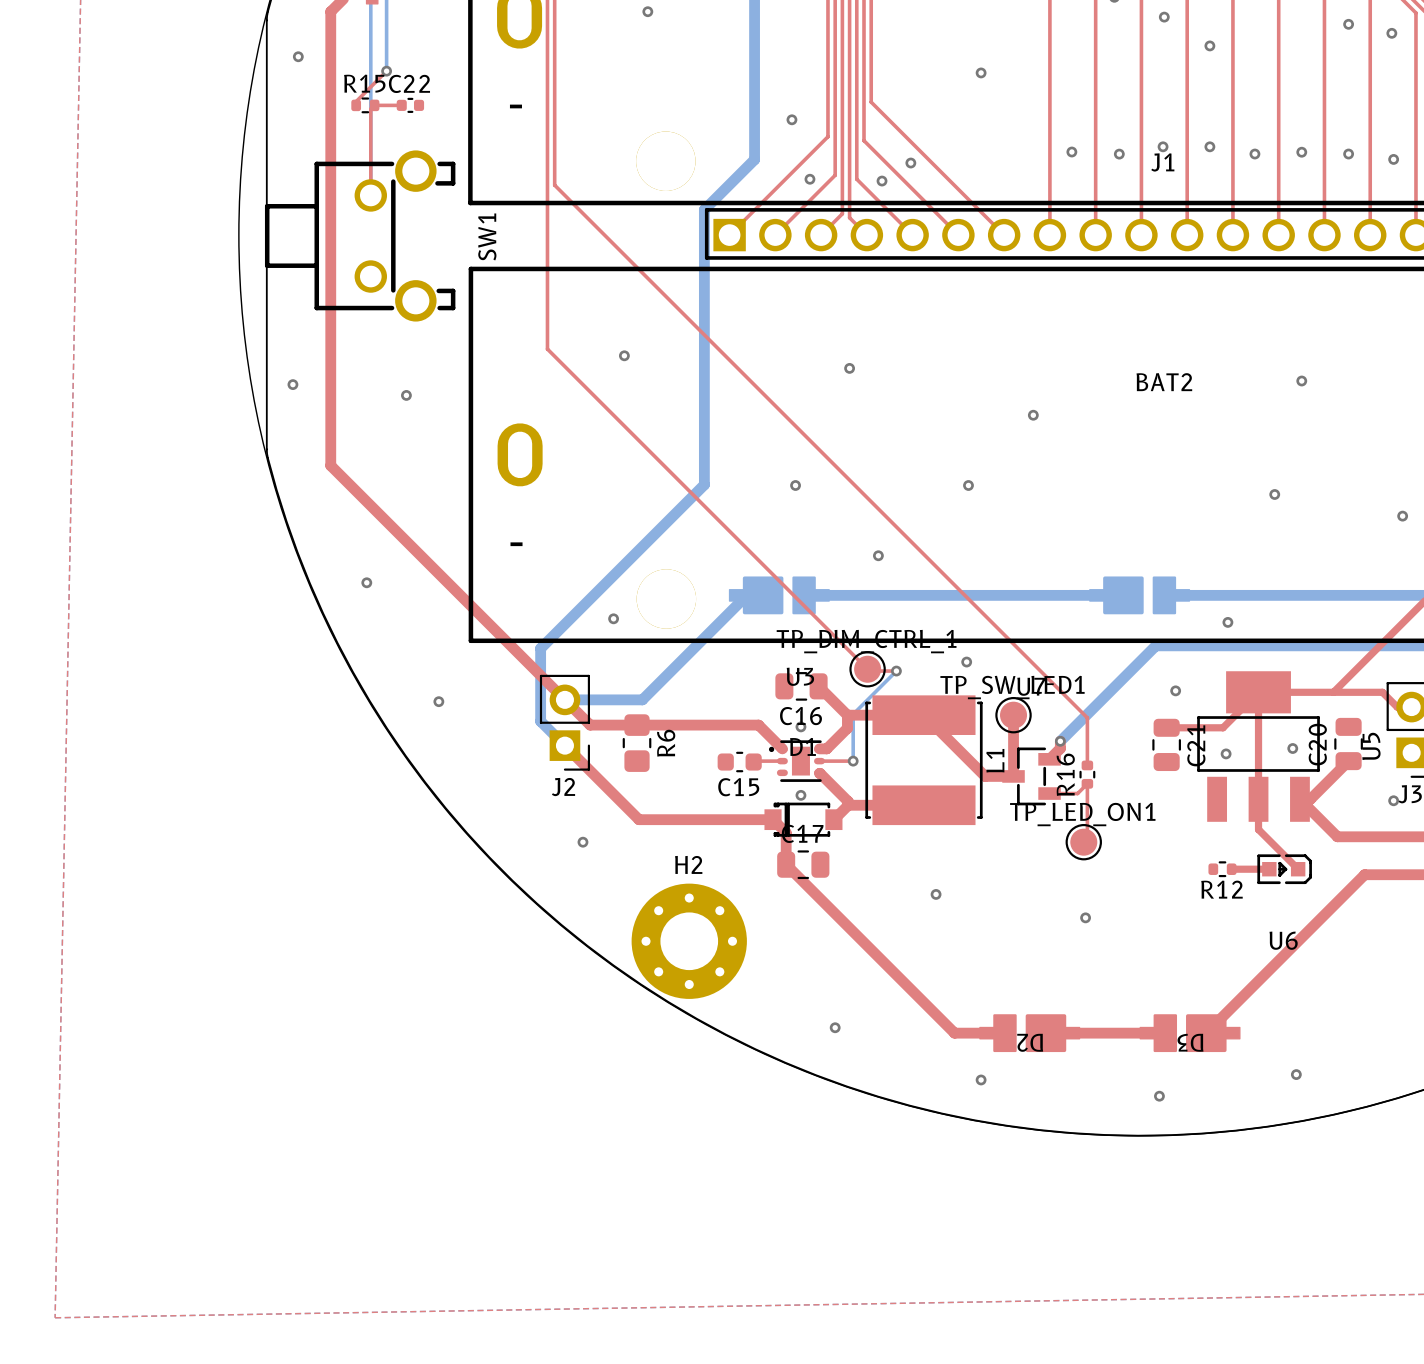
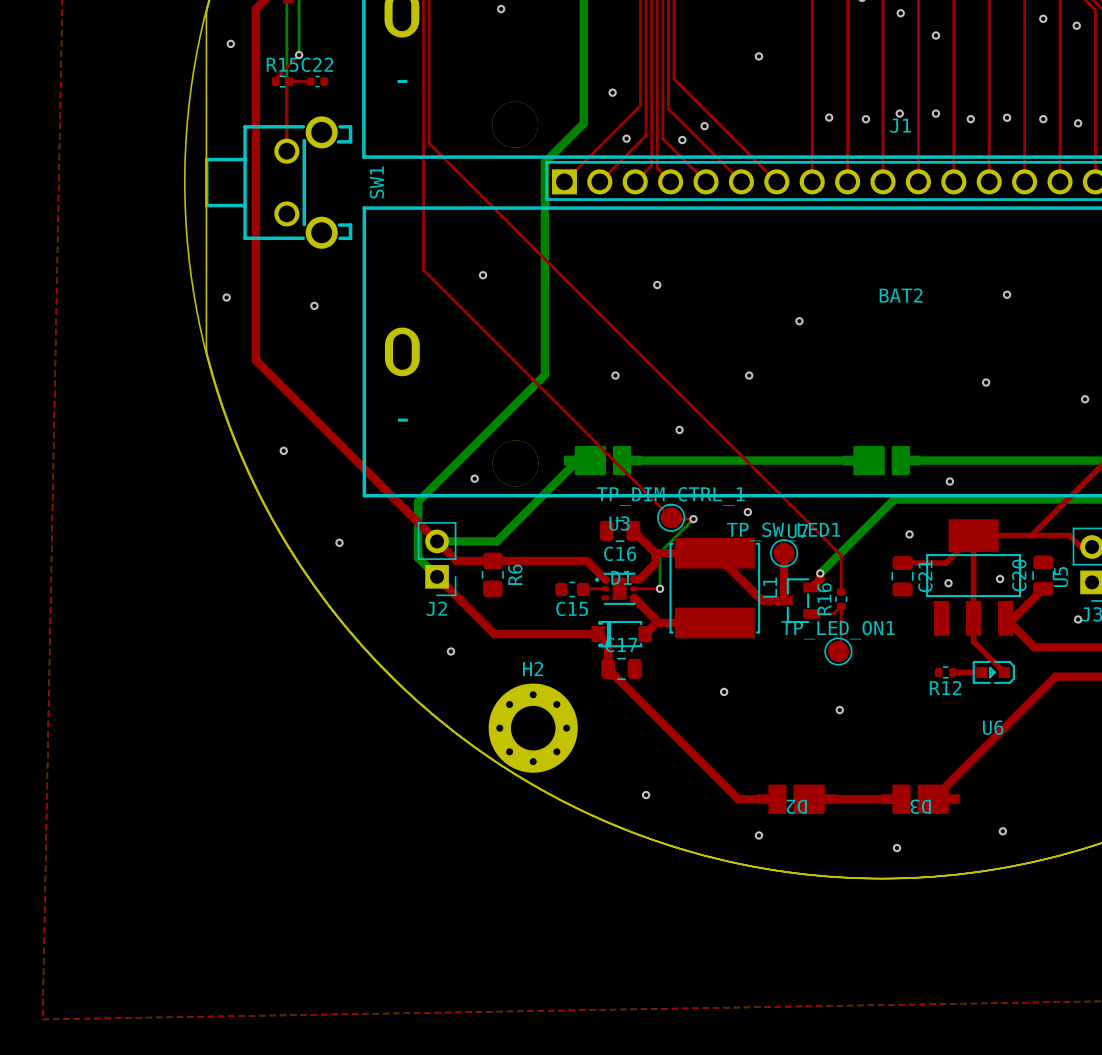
via: (800, 726) -> none
via: (800, 795) -> none

